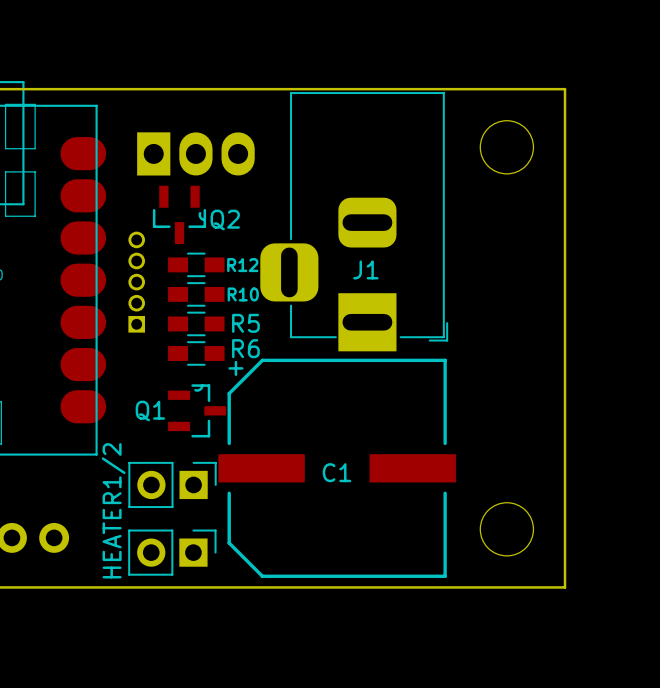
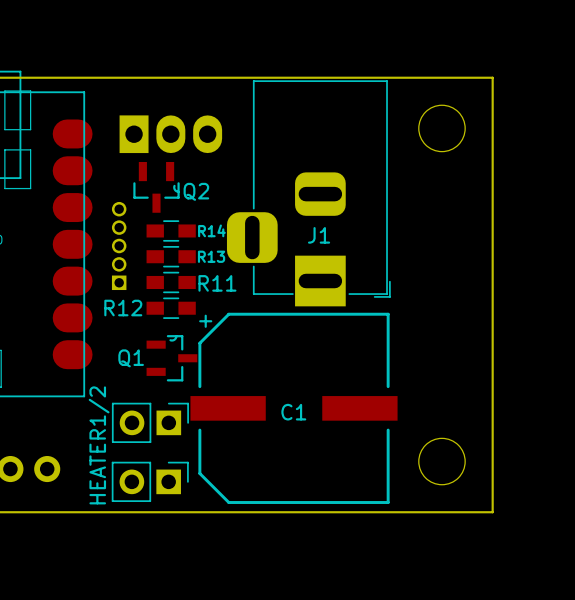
R12 name: R12 (242, 265) -> R14 (211, 230)
R10 name: R10 (243, 294) -> R13 (211, 256)
R5 name: R5 (245, 323) -> R11 (217, 283)
R6 name: R6 (245, 348) -> R12 (123, 308)

